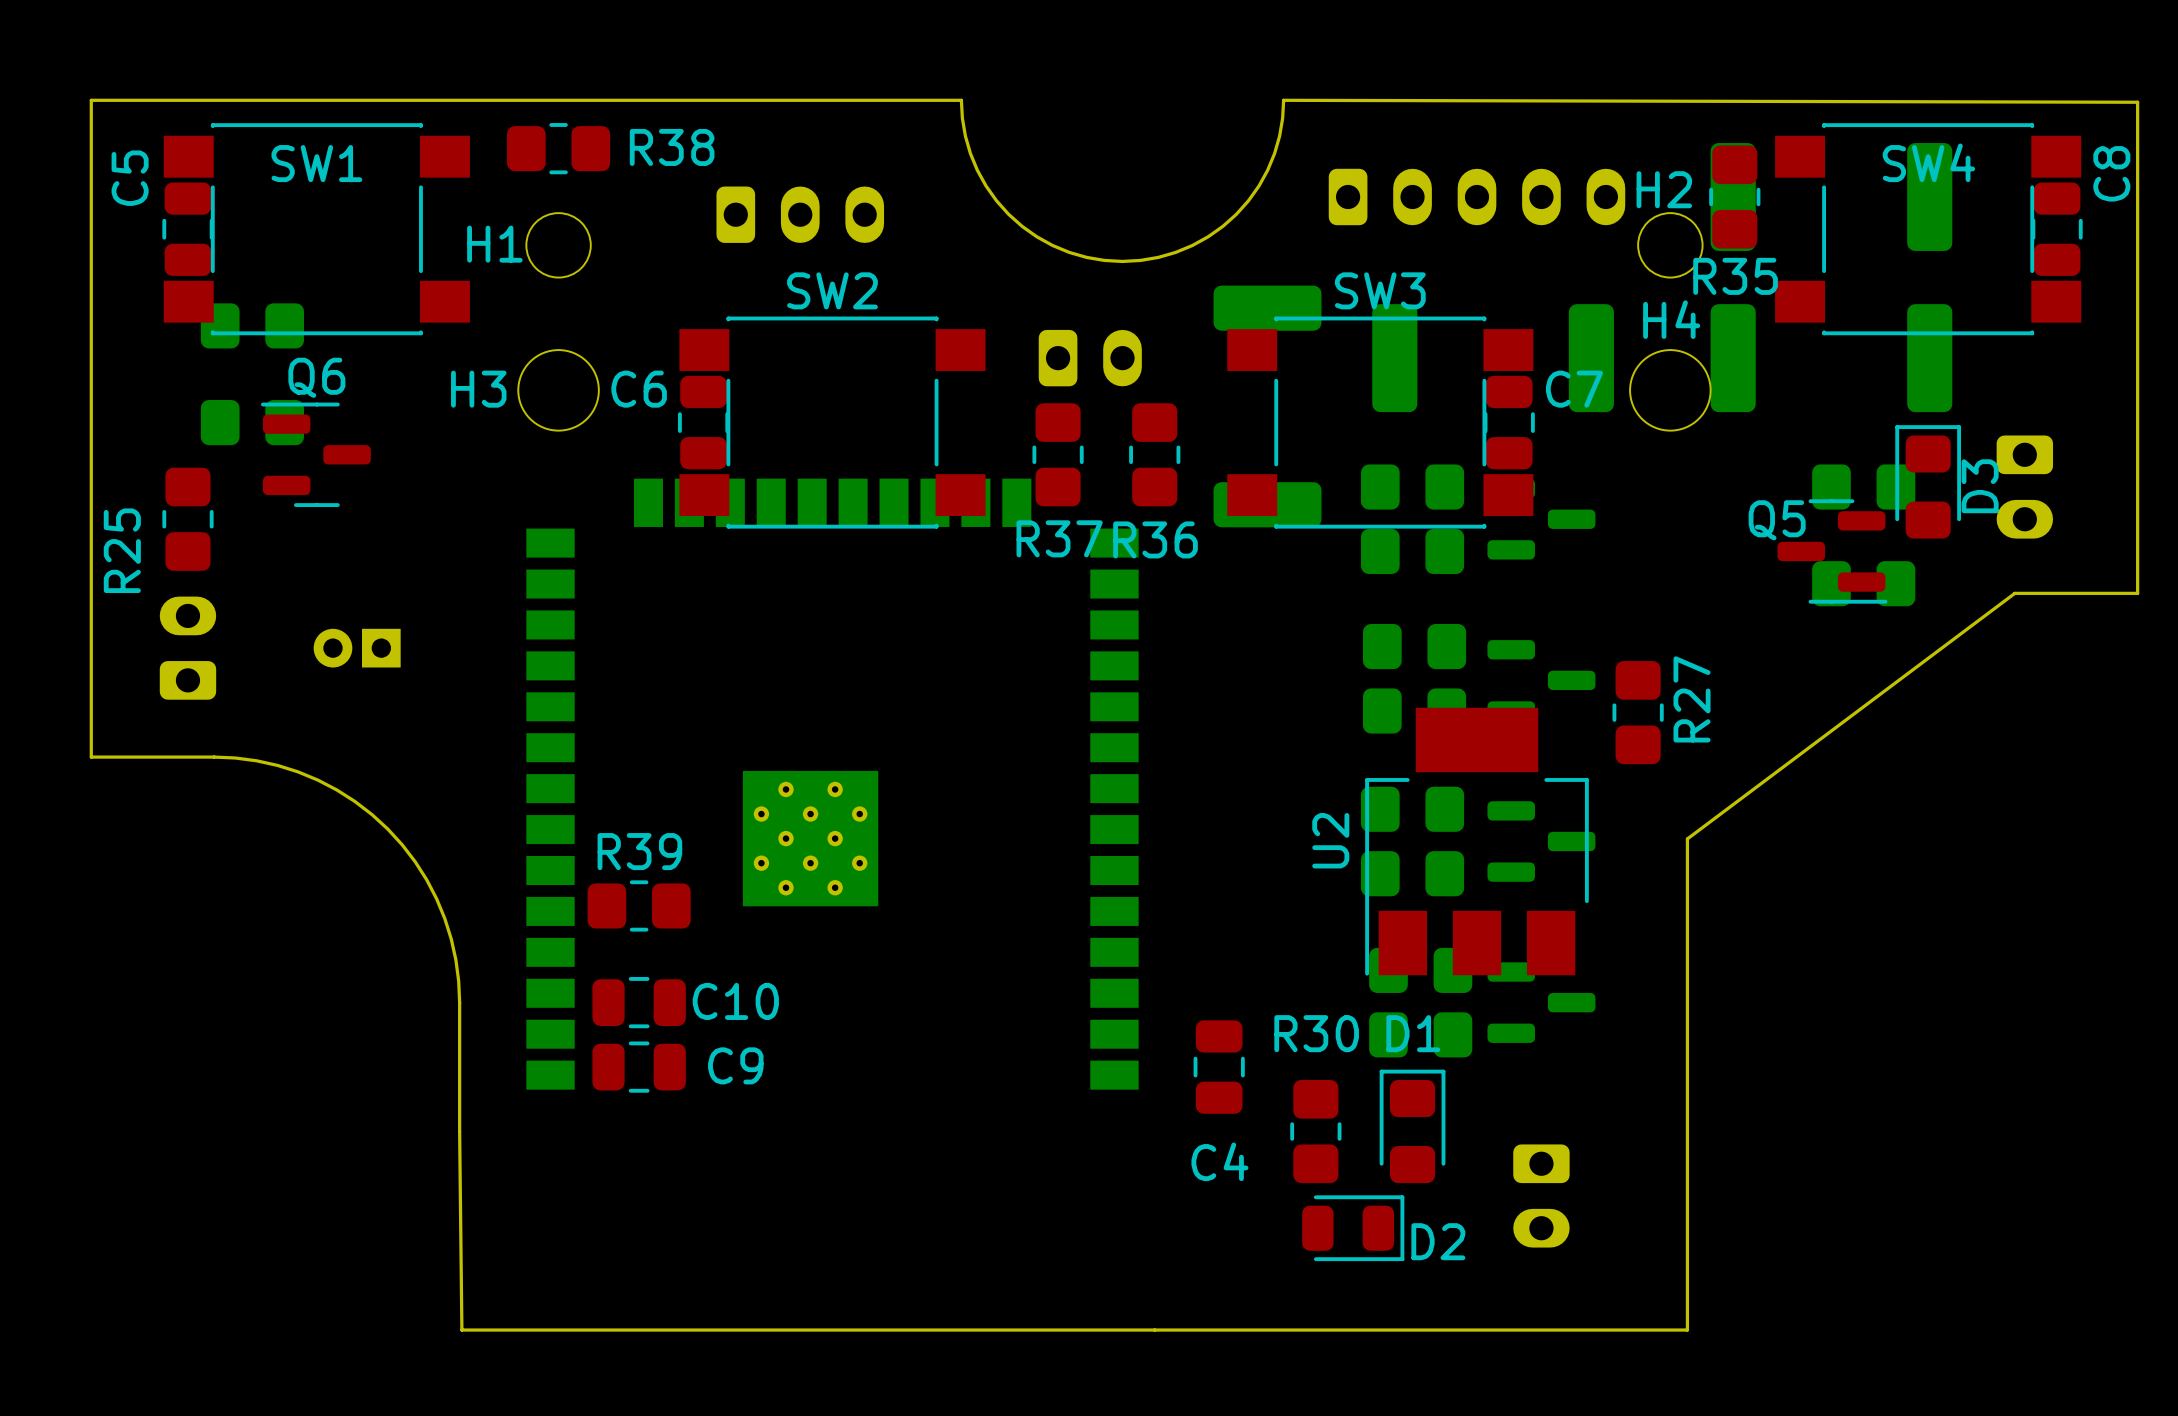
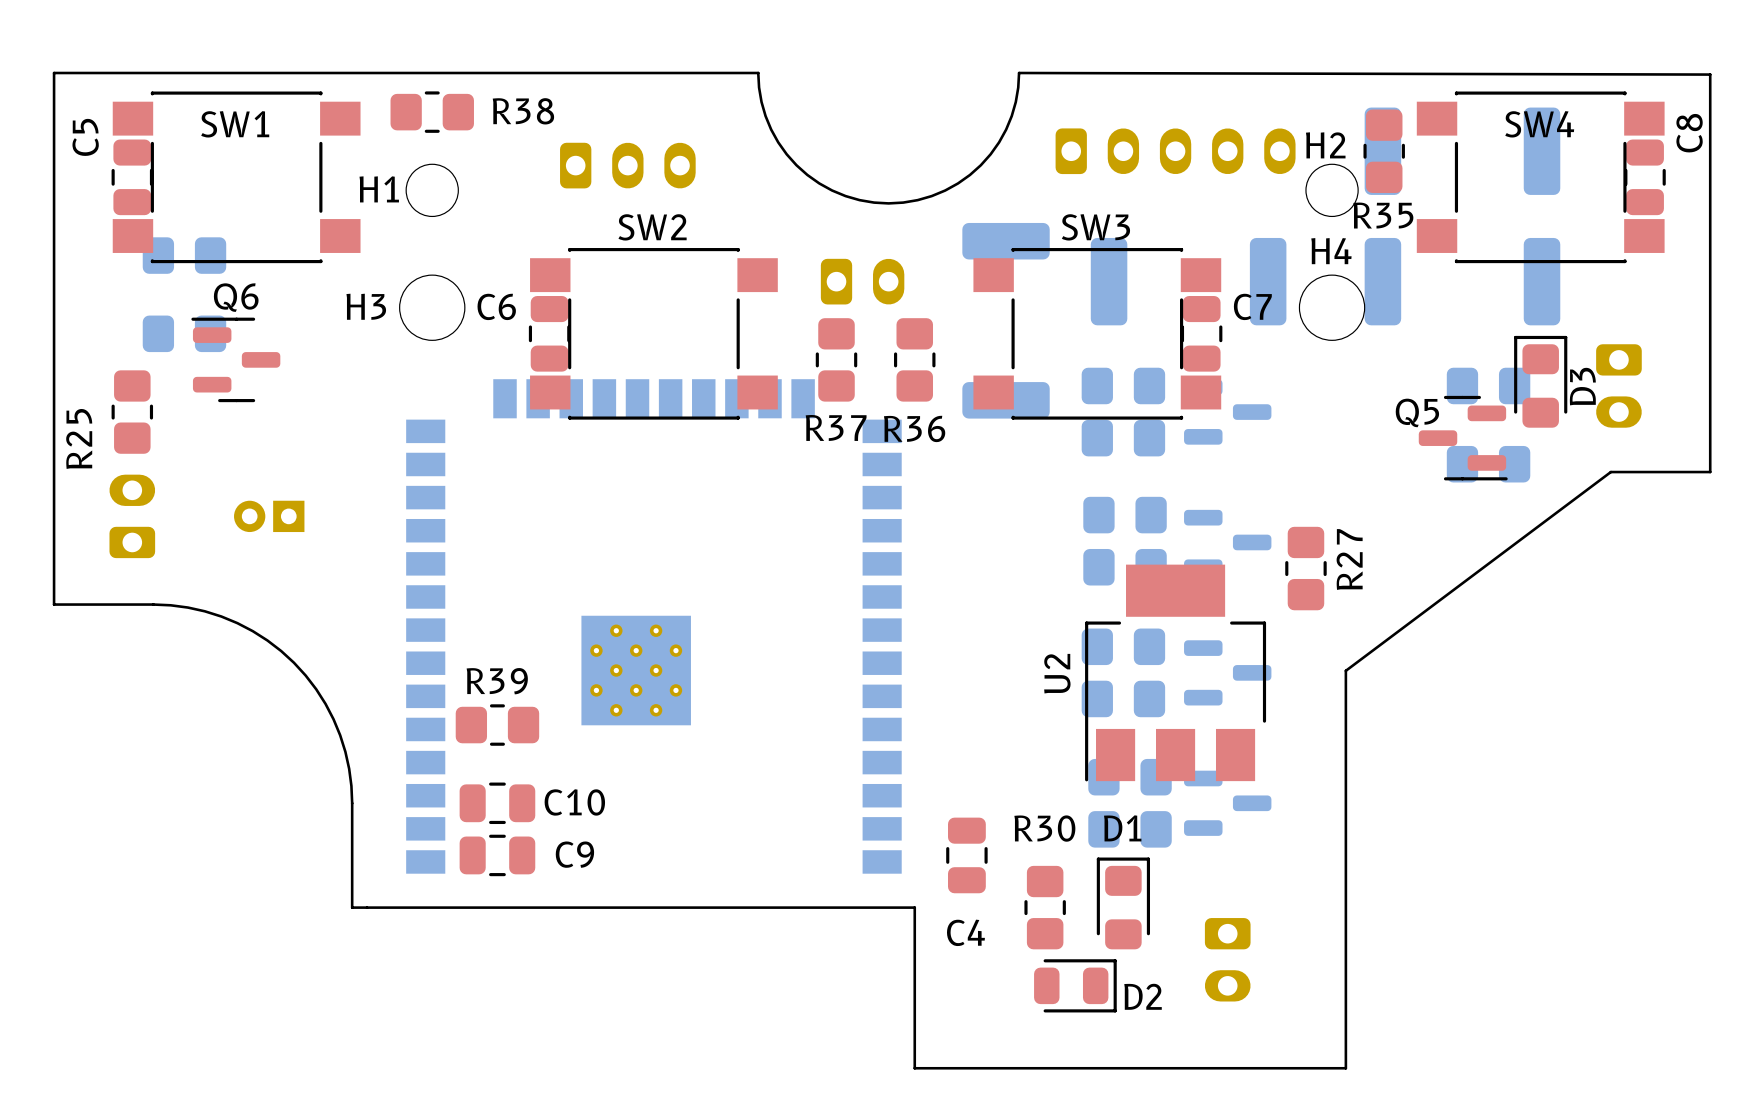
board edge: (459, 1131) (461, 1330) (1154, 1330) -> (352, 907) (914, 907) (914, 1068)

